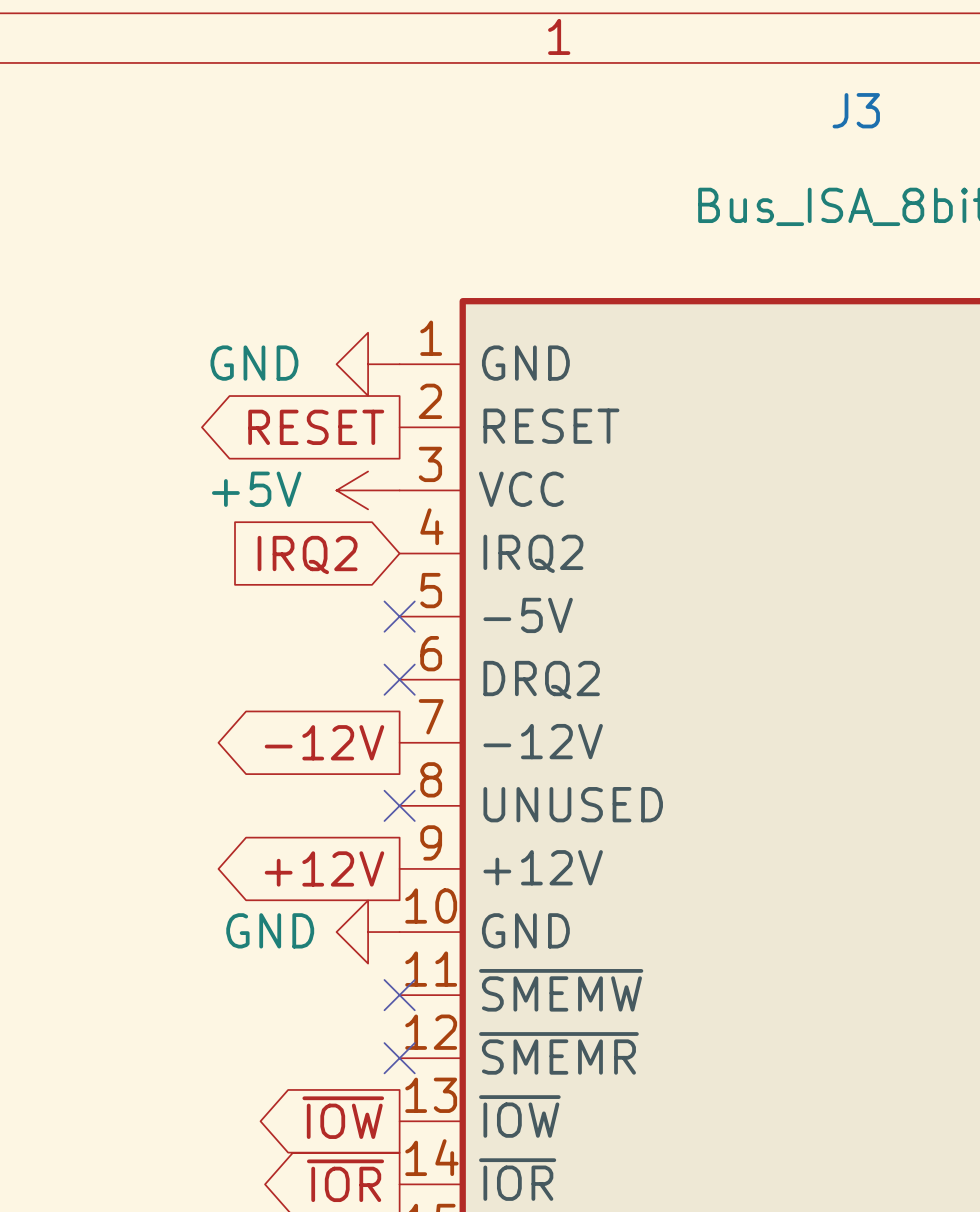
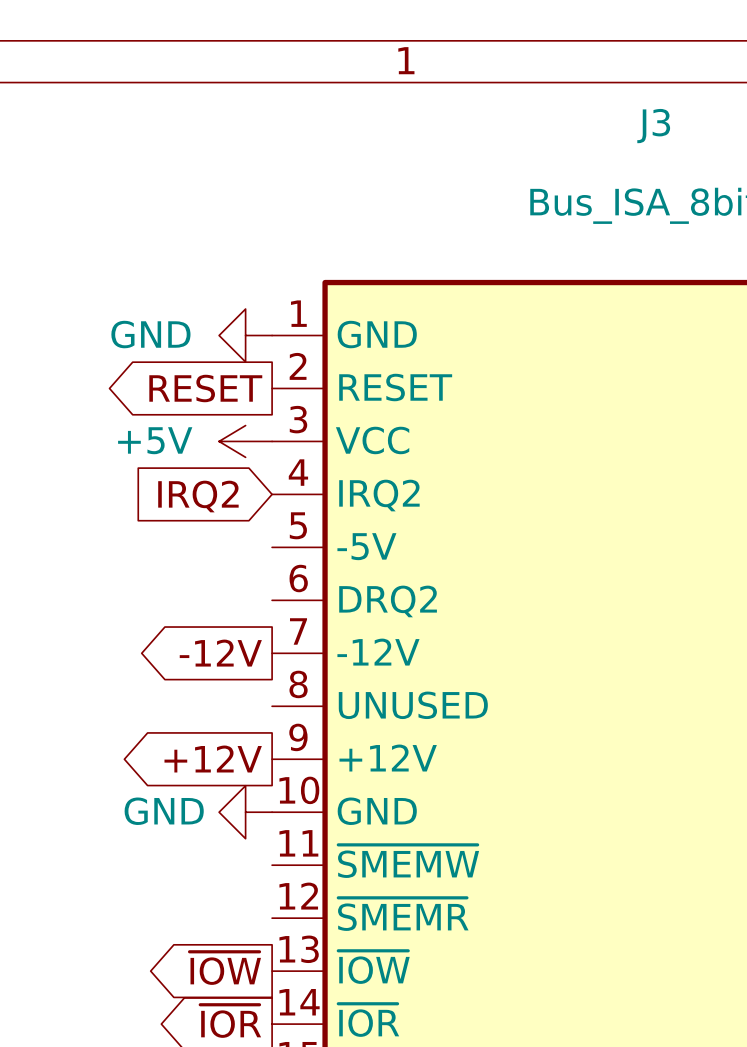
no-connect mark: (399, 616) -> none
no-connect mark: (399, 679) -> none
no-connect mark: (399, 805) -> none
no-connect mark: (399, 995) -> none
no-connect mark: (399, 1058) -> none

